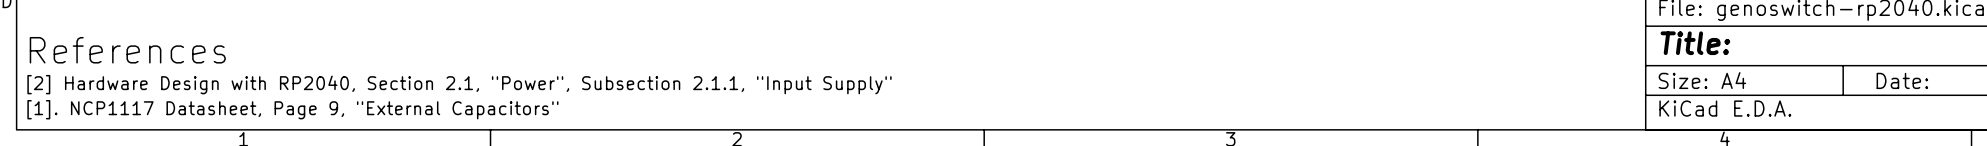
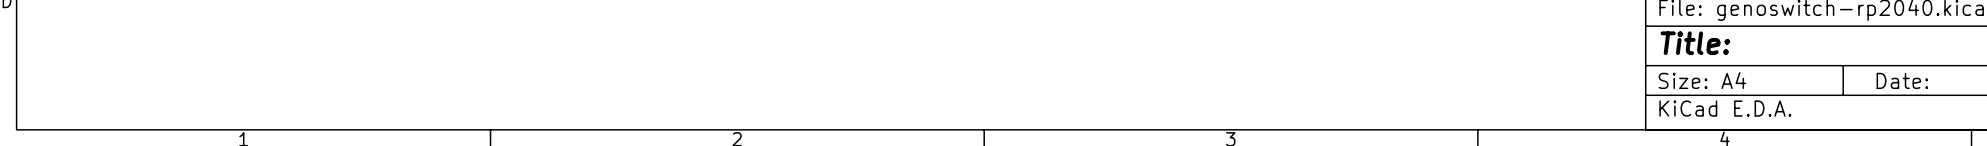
text: References (127, 50) -> none
text: [2] Hardware Design with RP2040, Section 2.1, "Power", Subsection 2.1.1, "Input Supply" (459, 84) -> none
text: [1]. NCP1117 Datasheet, Page 9, "External Capacitors" (292, 109) -> none

